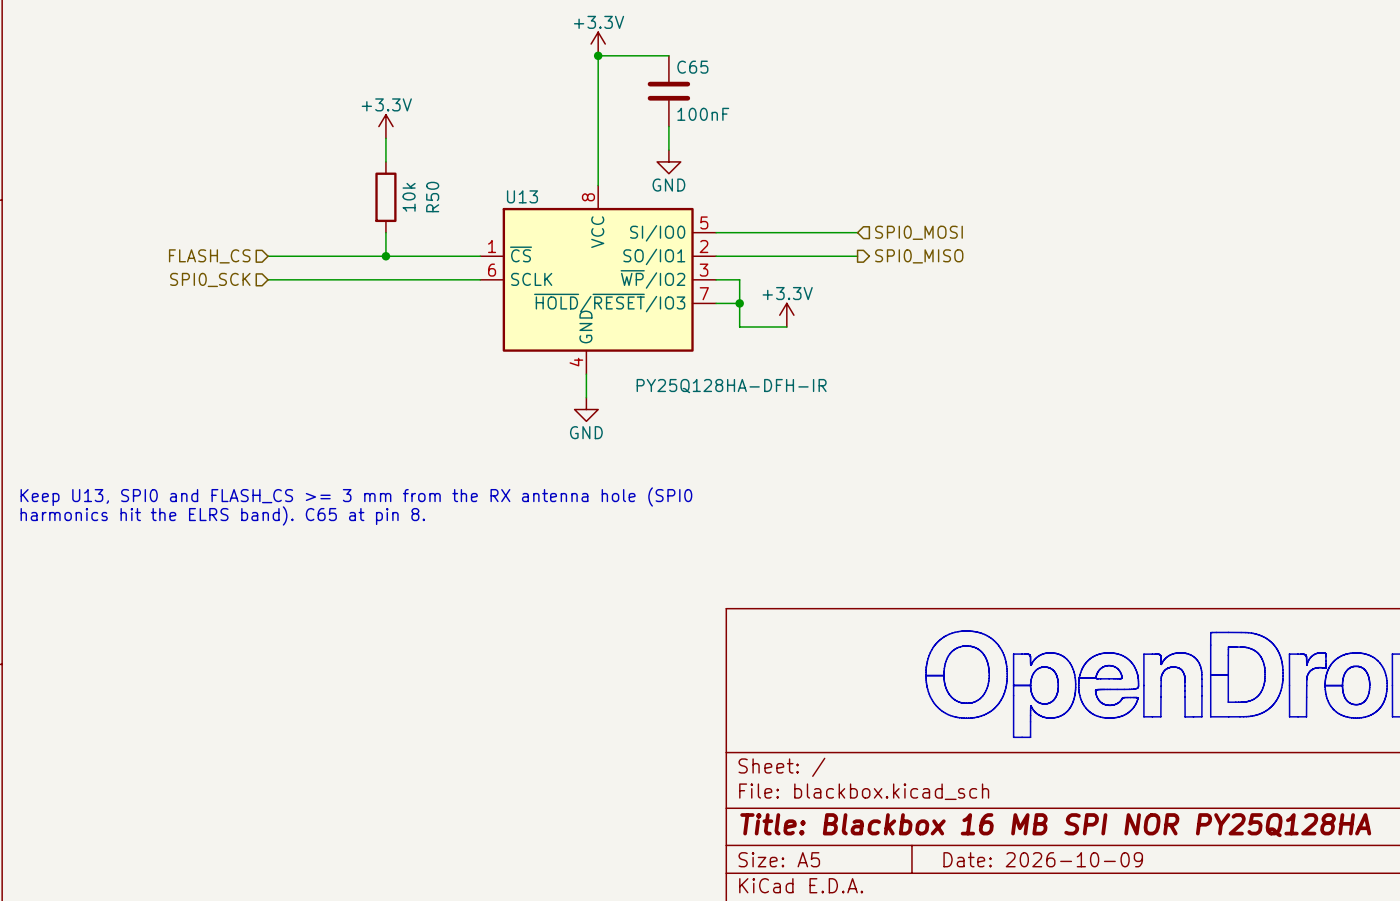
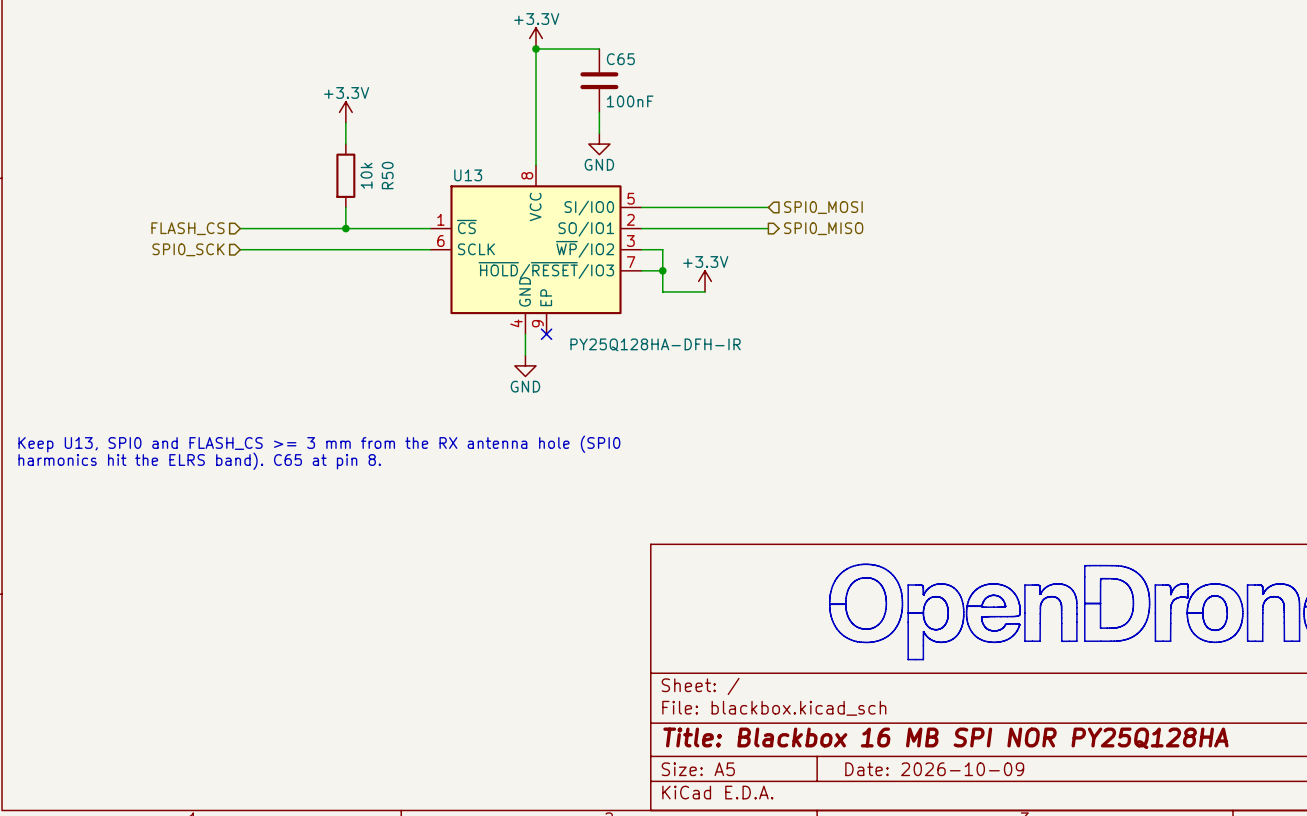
U13 symbol: [480, 185, 717, 375] -> [430, 165, 642, 335]
no-connect mark: none -> (546, 334)

